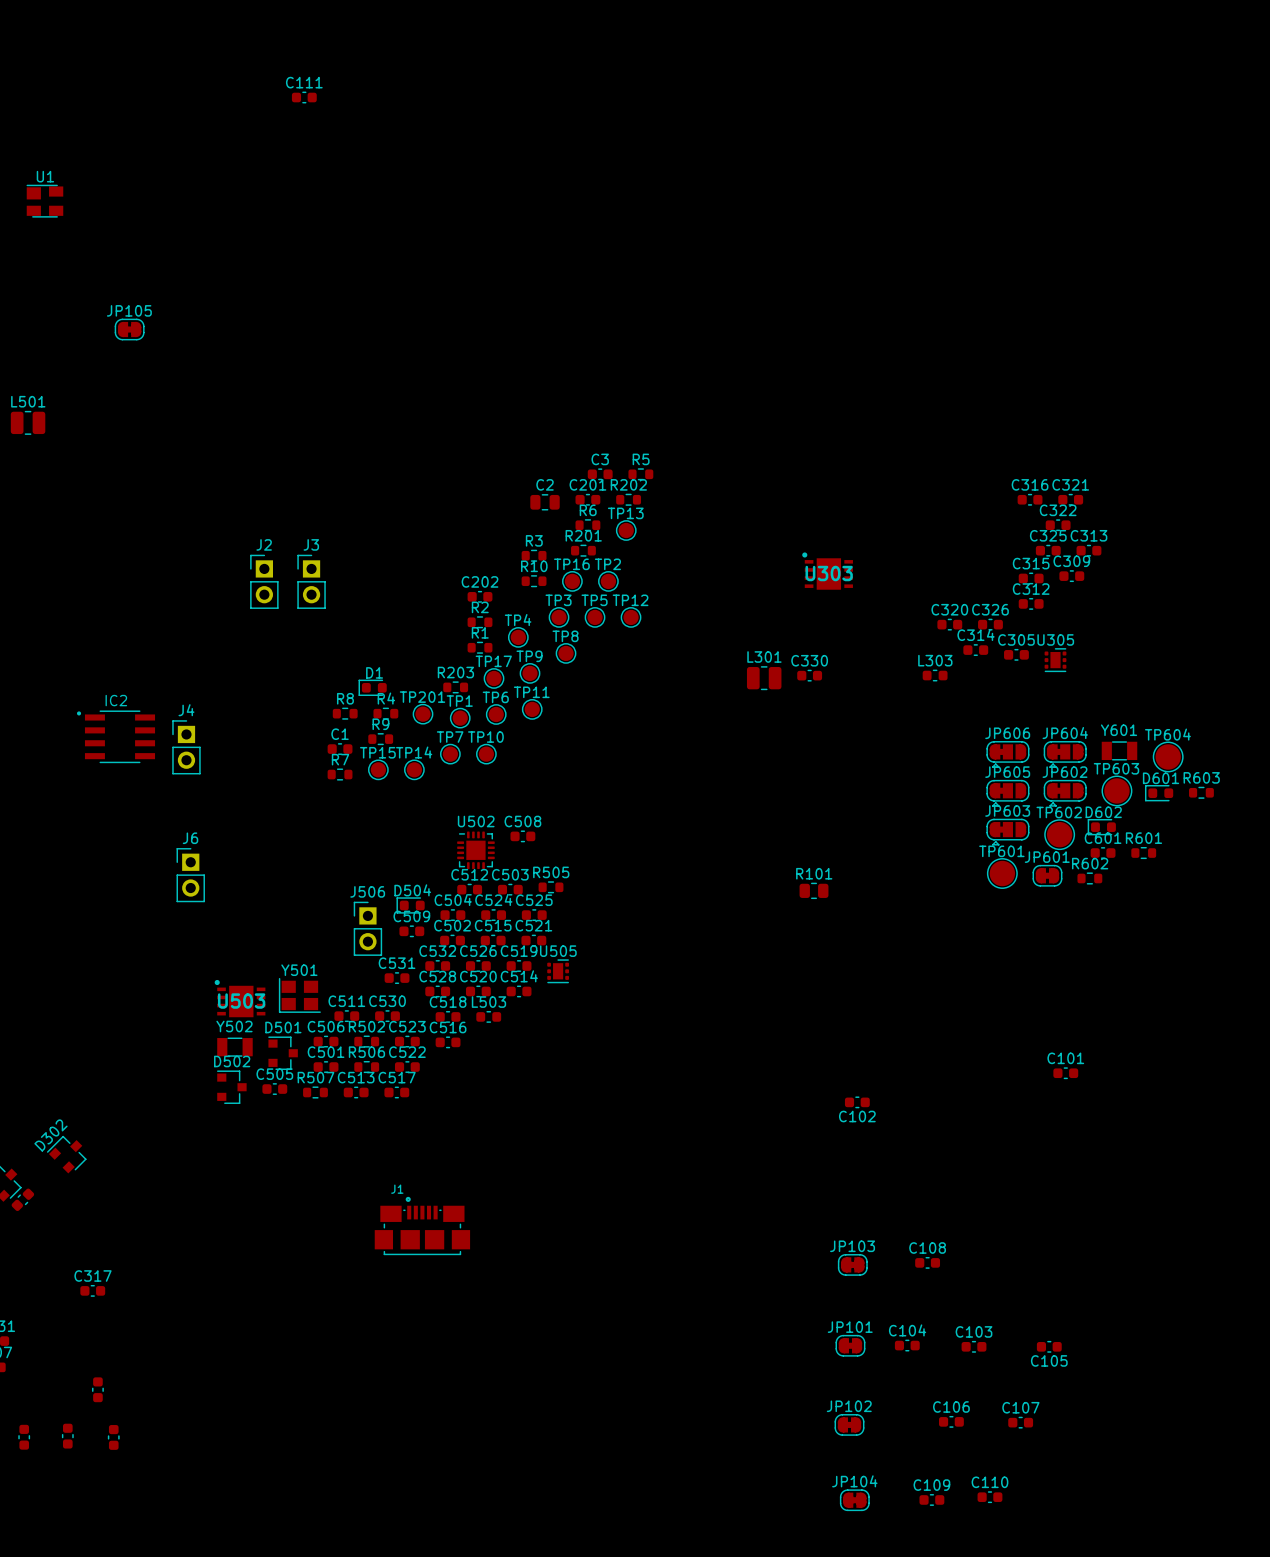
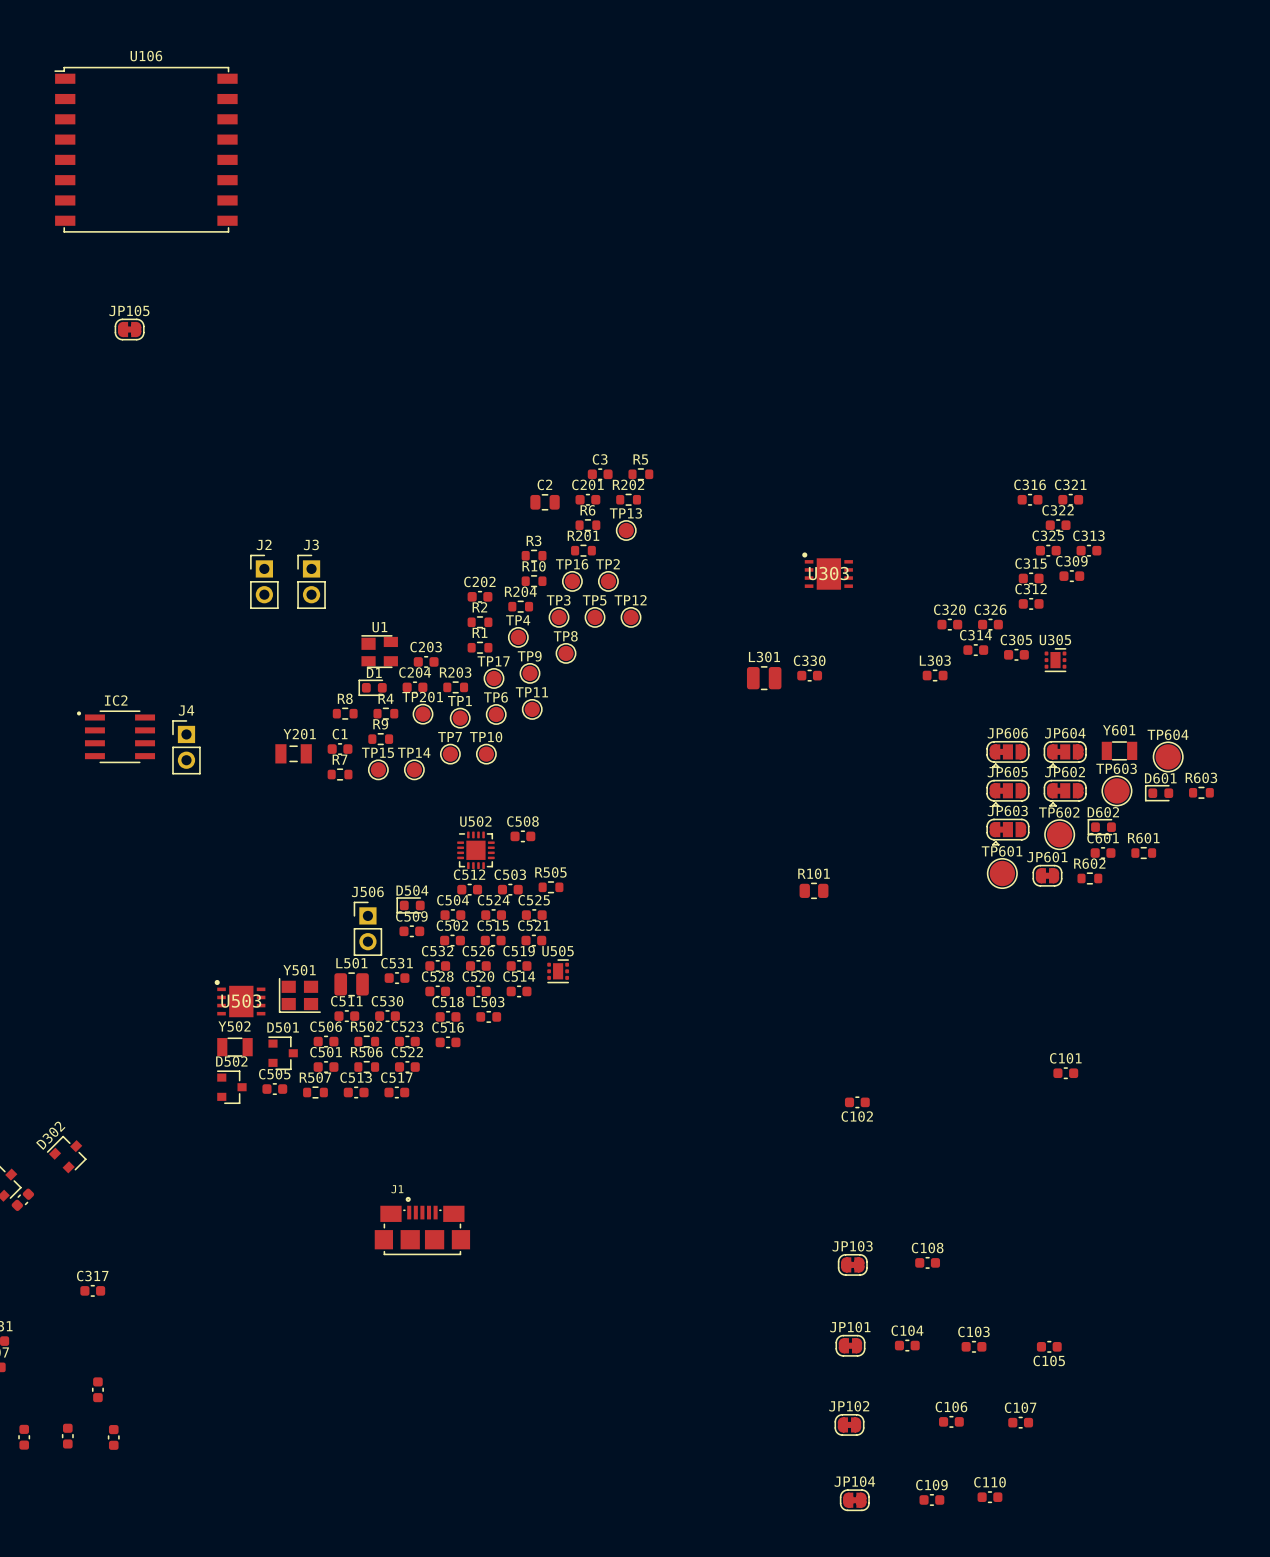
C111: (304, 97) -> none
U106: none -> (146, 149)
U1 position: (44, 201) -> (379, 651)
L501 position: (28, 422) -> (351, 984)
R204: none -> (520, 606)
C203: none -> (426, 661)
C204: none -> (414, 687)
Y201: none -> (293, 753)
J6: (190, 875) -> none

